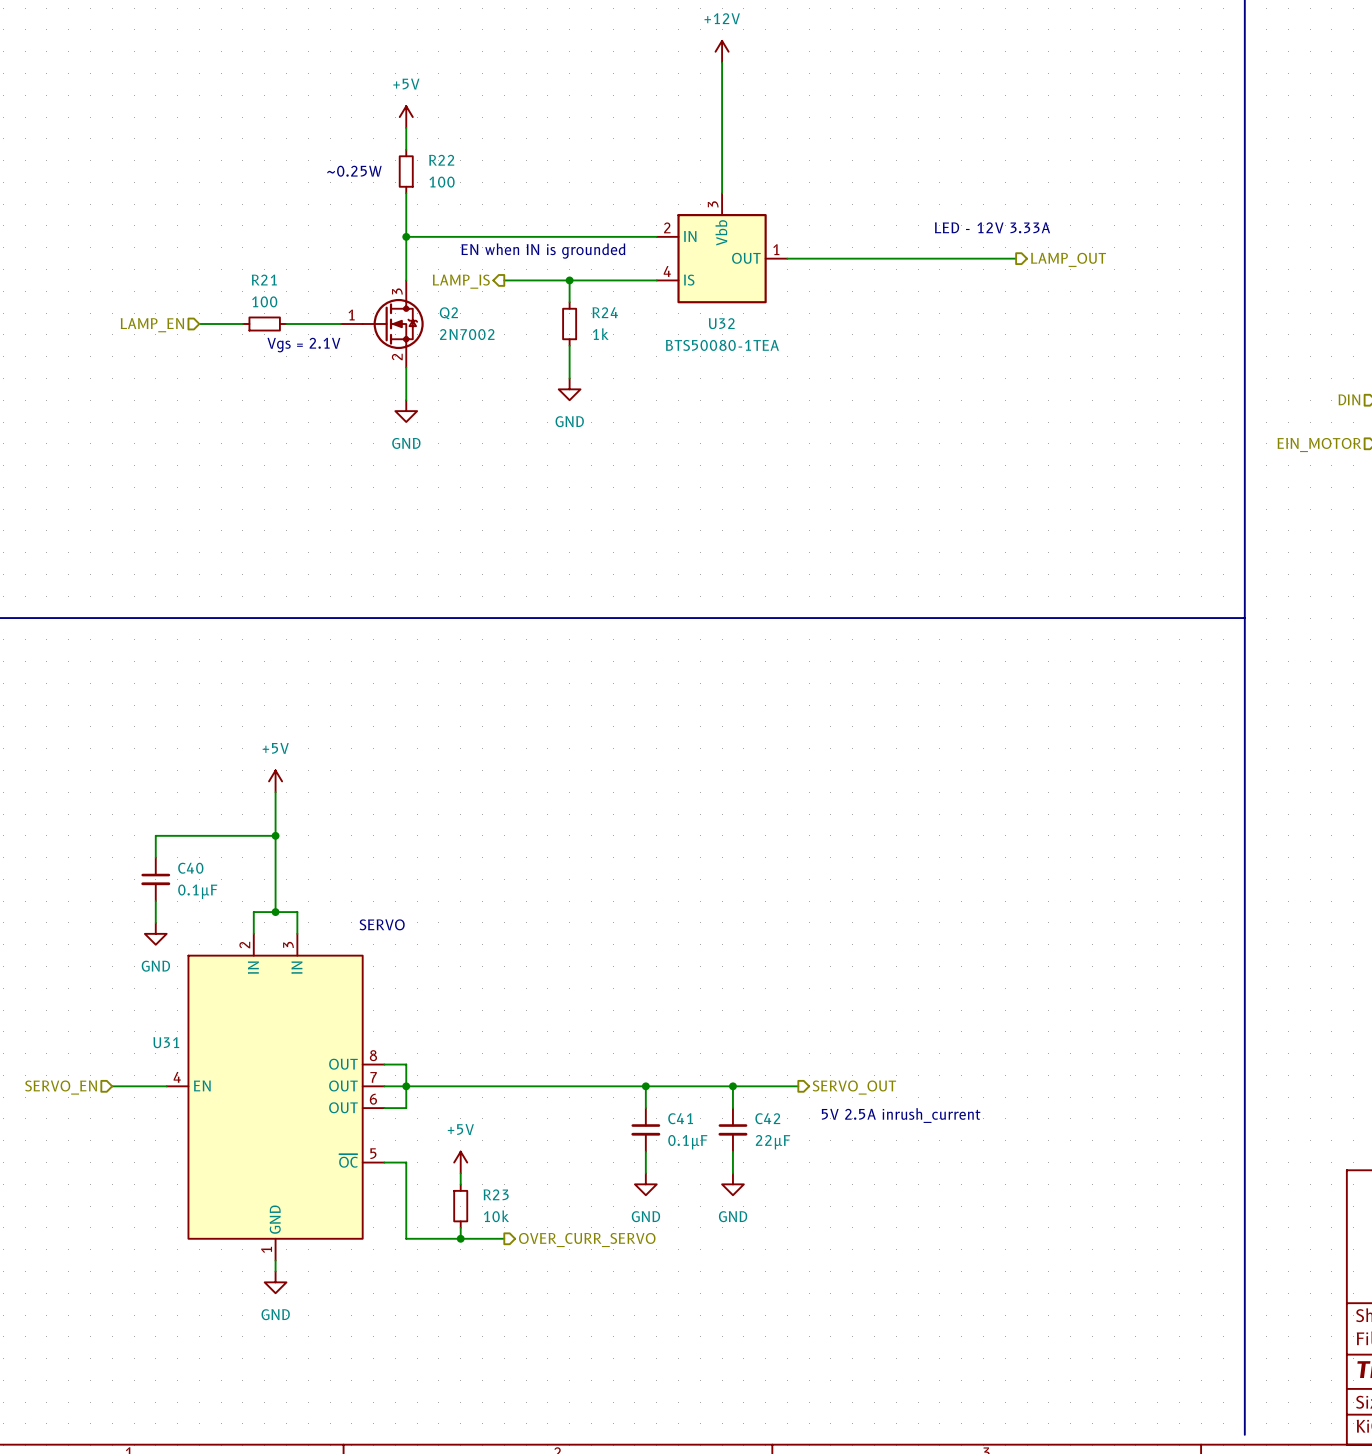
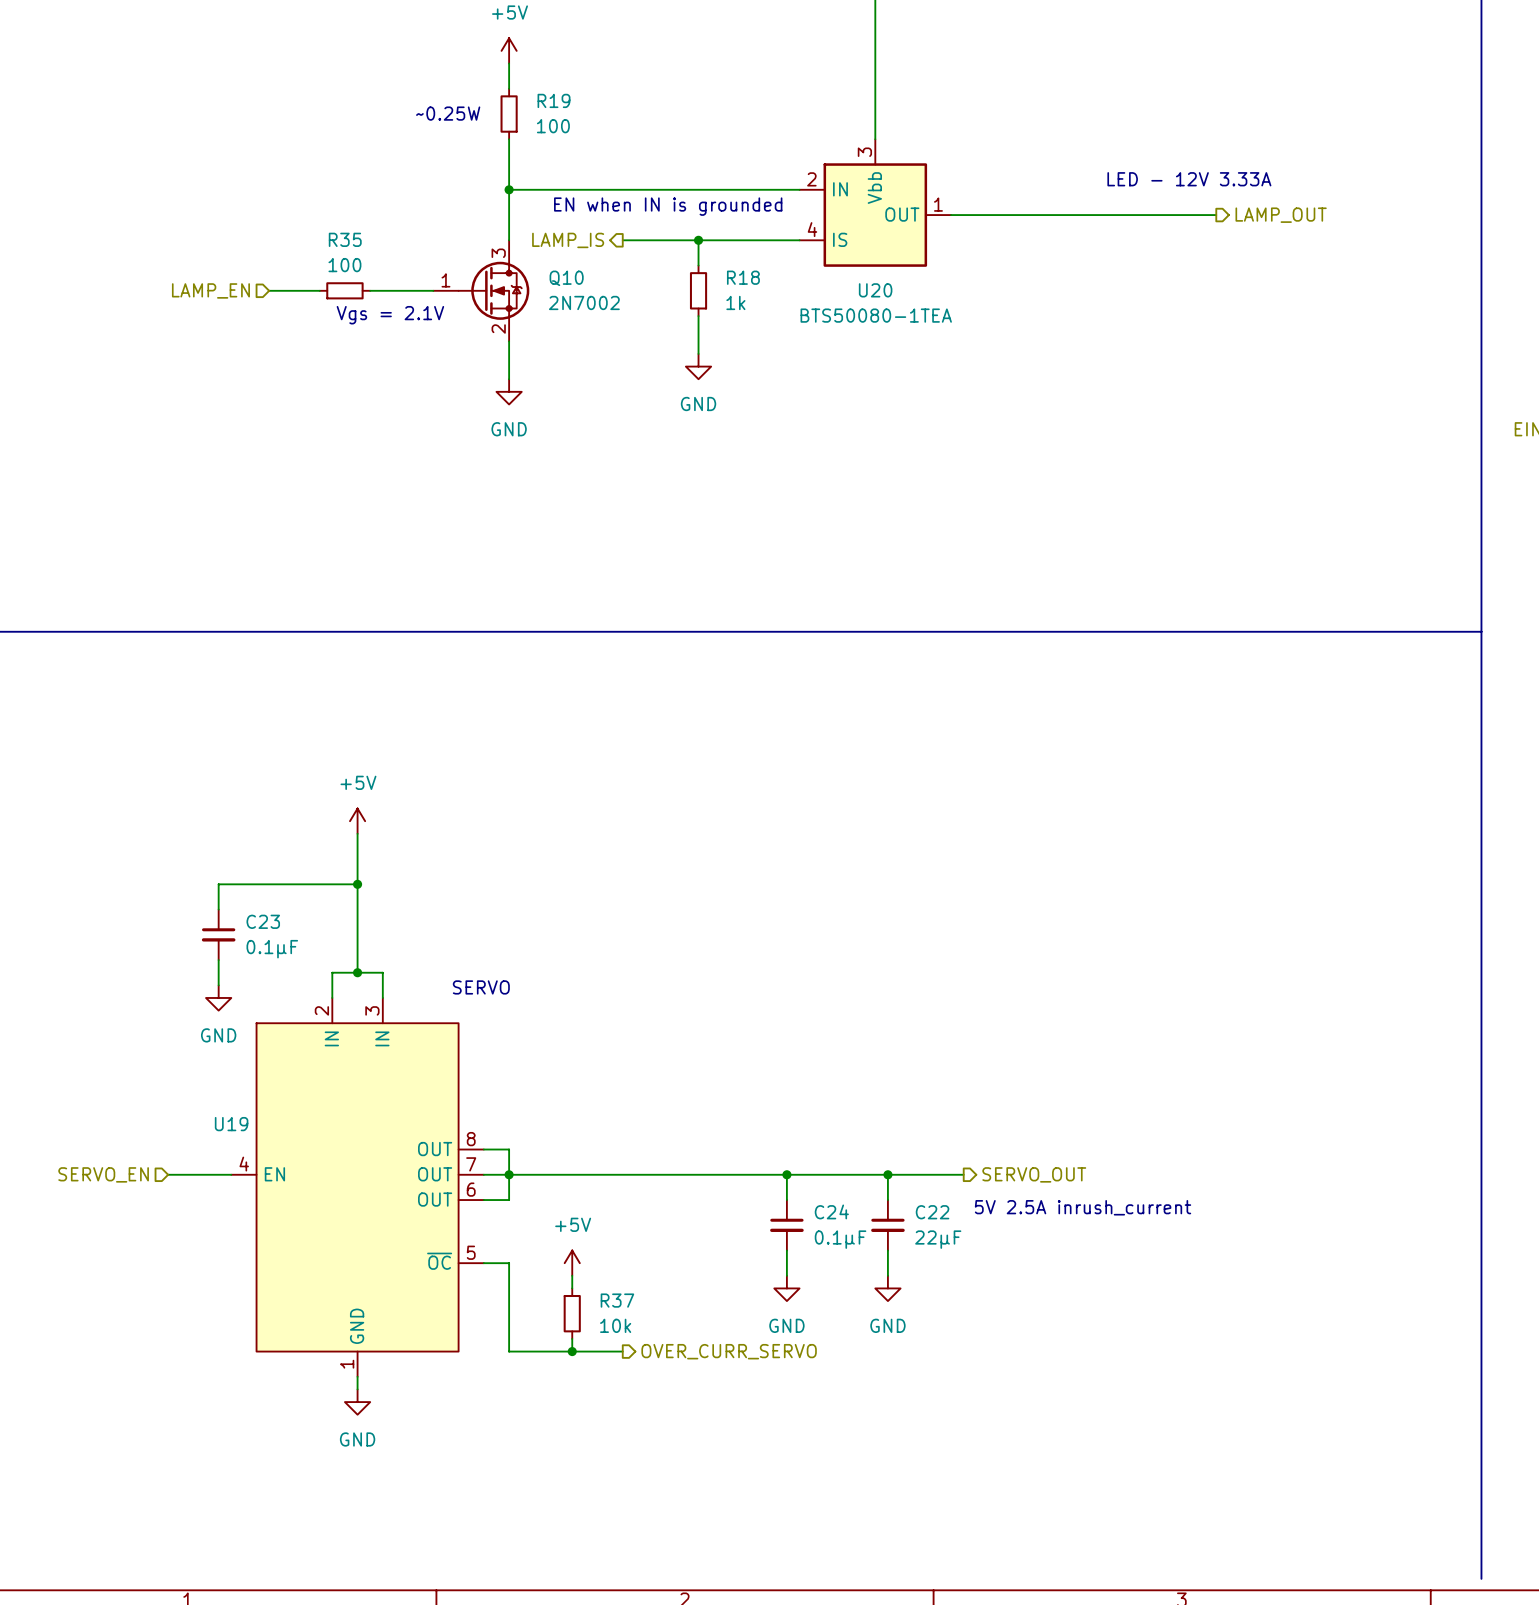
R22 name: R22 (441, 160) -> R19 (554, 100)
R21 name: R21 (264, 280) -> R35 (345, 239)
R24 name: R24 (605, 312) -> R18 (743, 277)
Q2 name: Q2 (448, 313) -> Q10 (566, 278)
U32 name: U32 (721, 323) -> U20 (875, 290)
C40 name: C40 (190, 868) -> C23 (263, 921)
U31 name: U31 (166, 1042) -> U19 (231, 1124)
C41 name: C41 (680, 1118) -> C24 (831, 1211)
C42 name: C42 (767, 1118) -> C22 (932, 1212)
R23 name: R23 (496, 1194) -> R37 (617, 1300)

